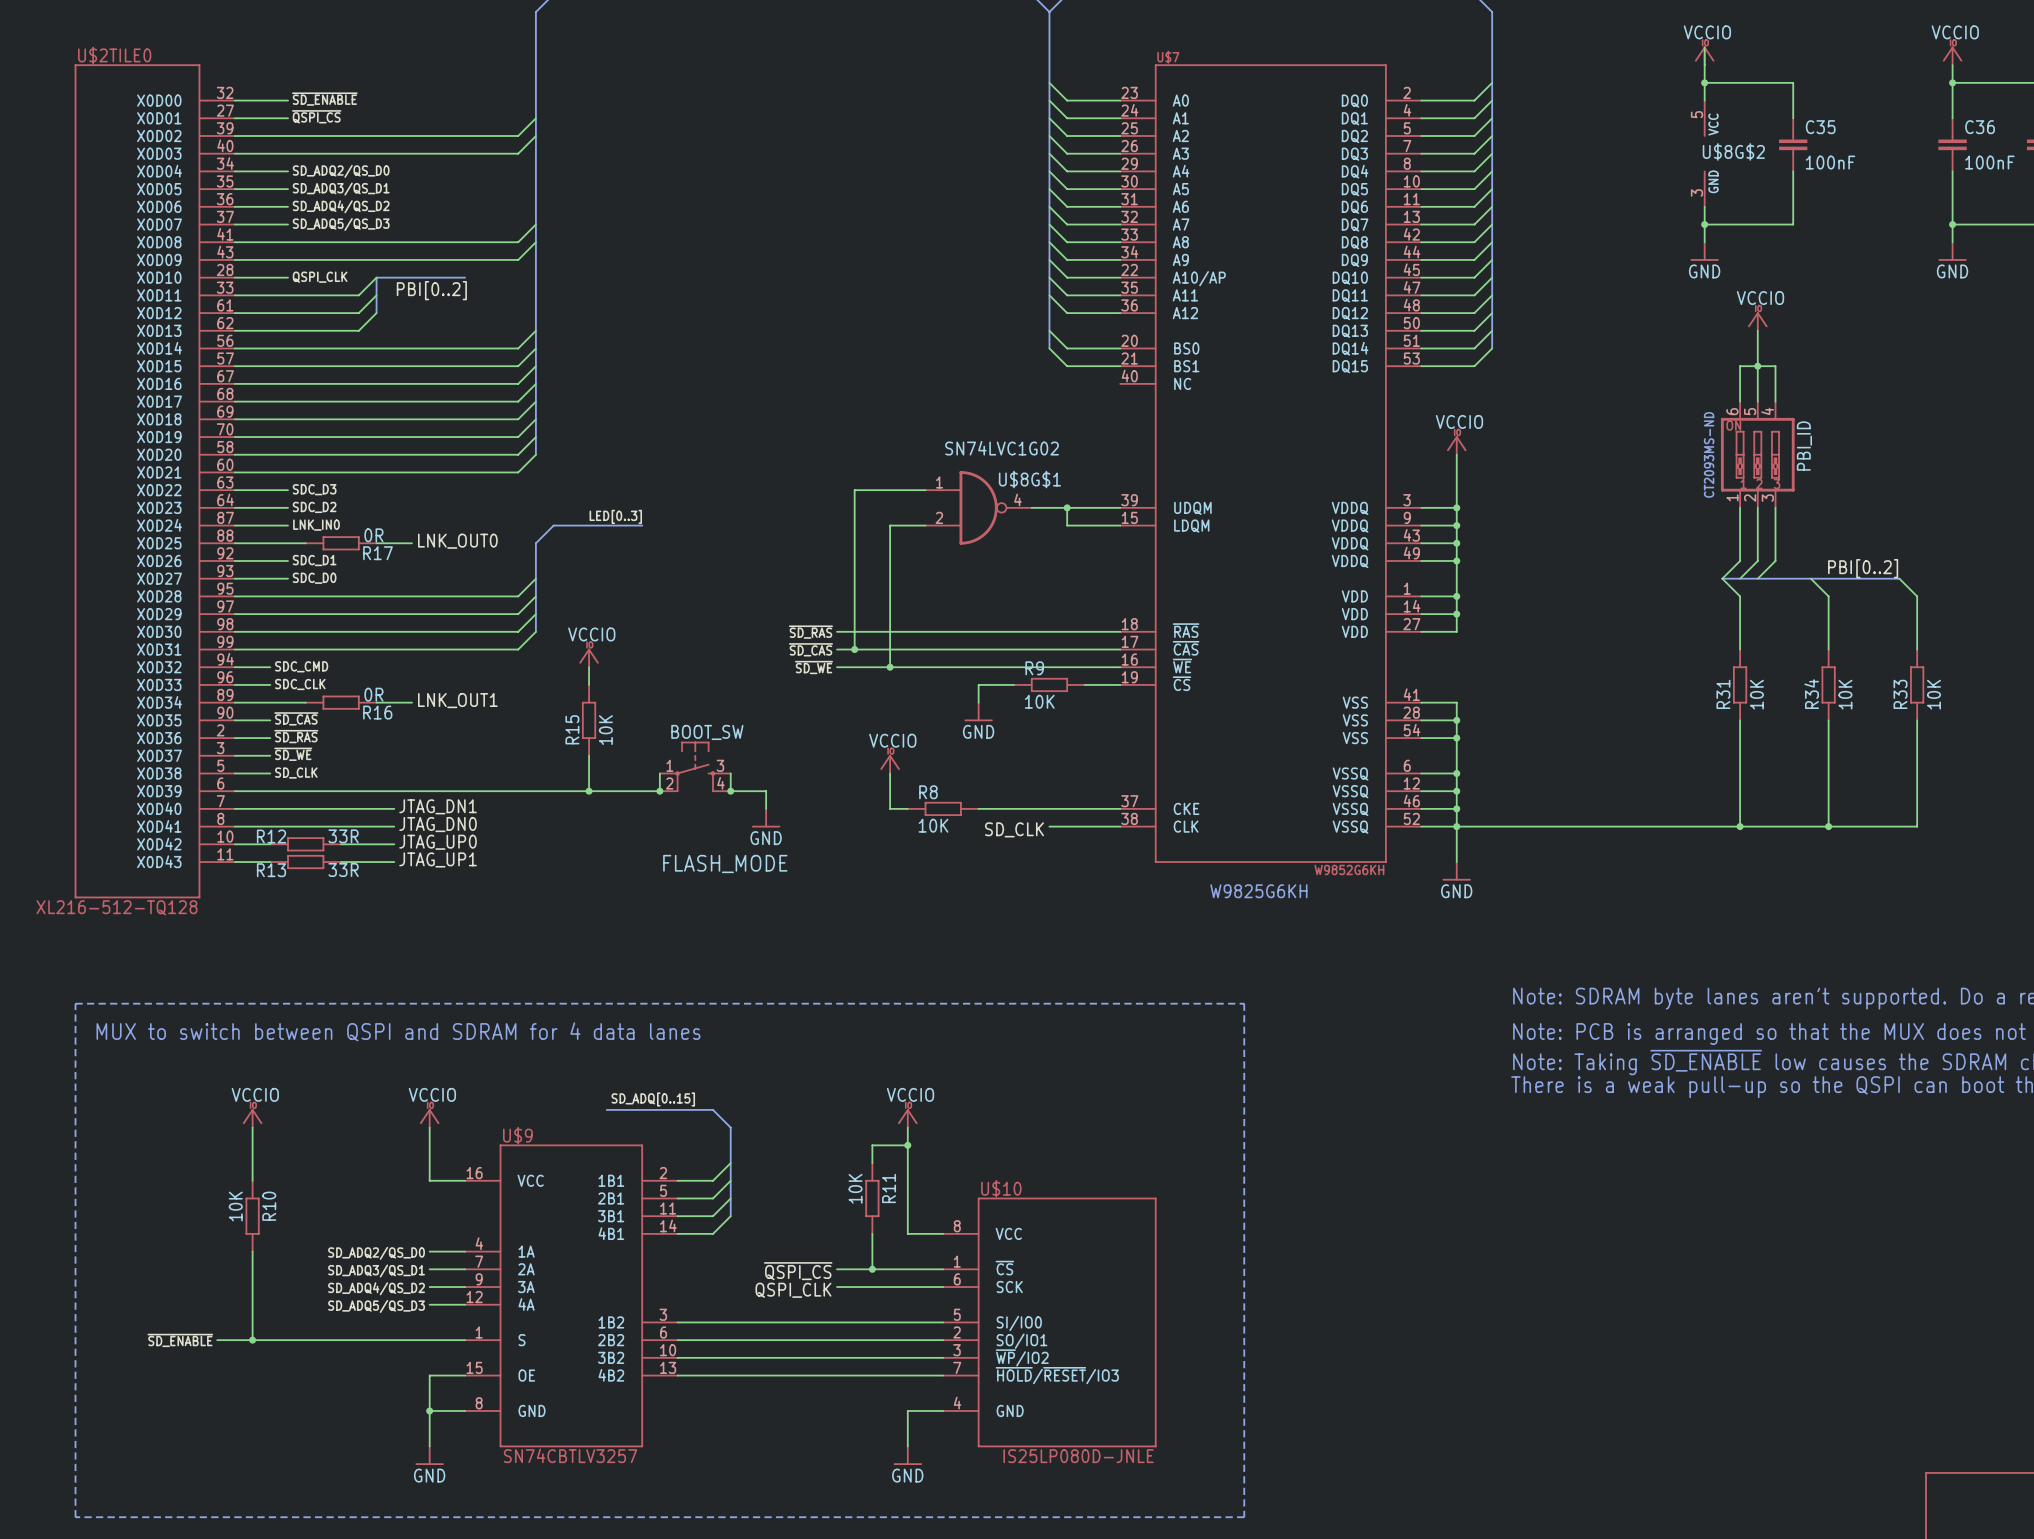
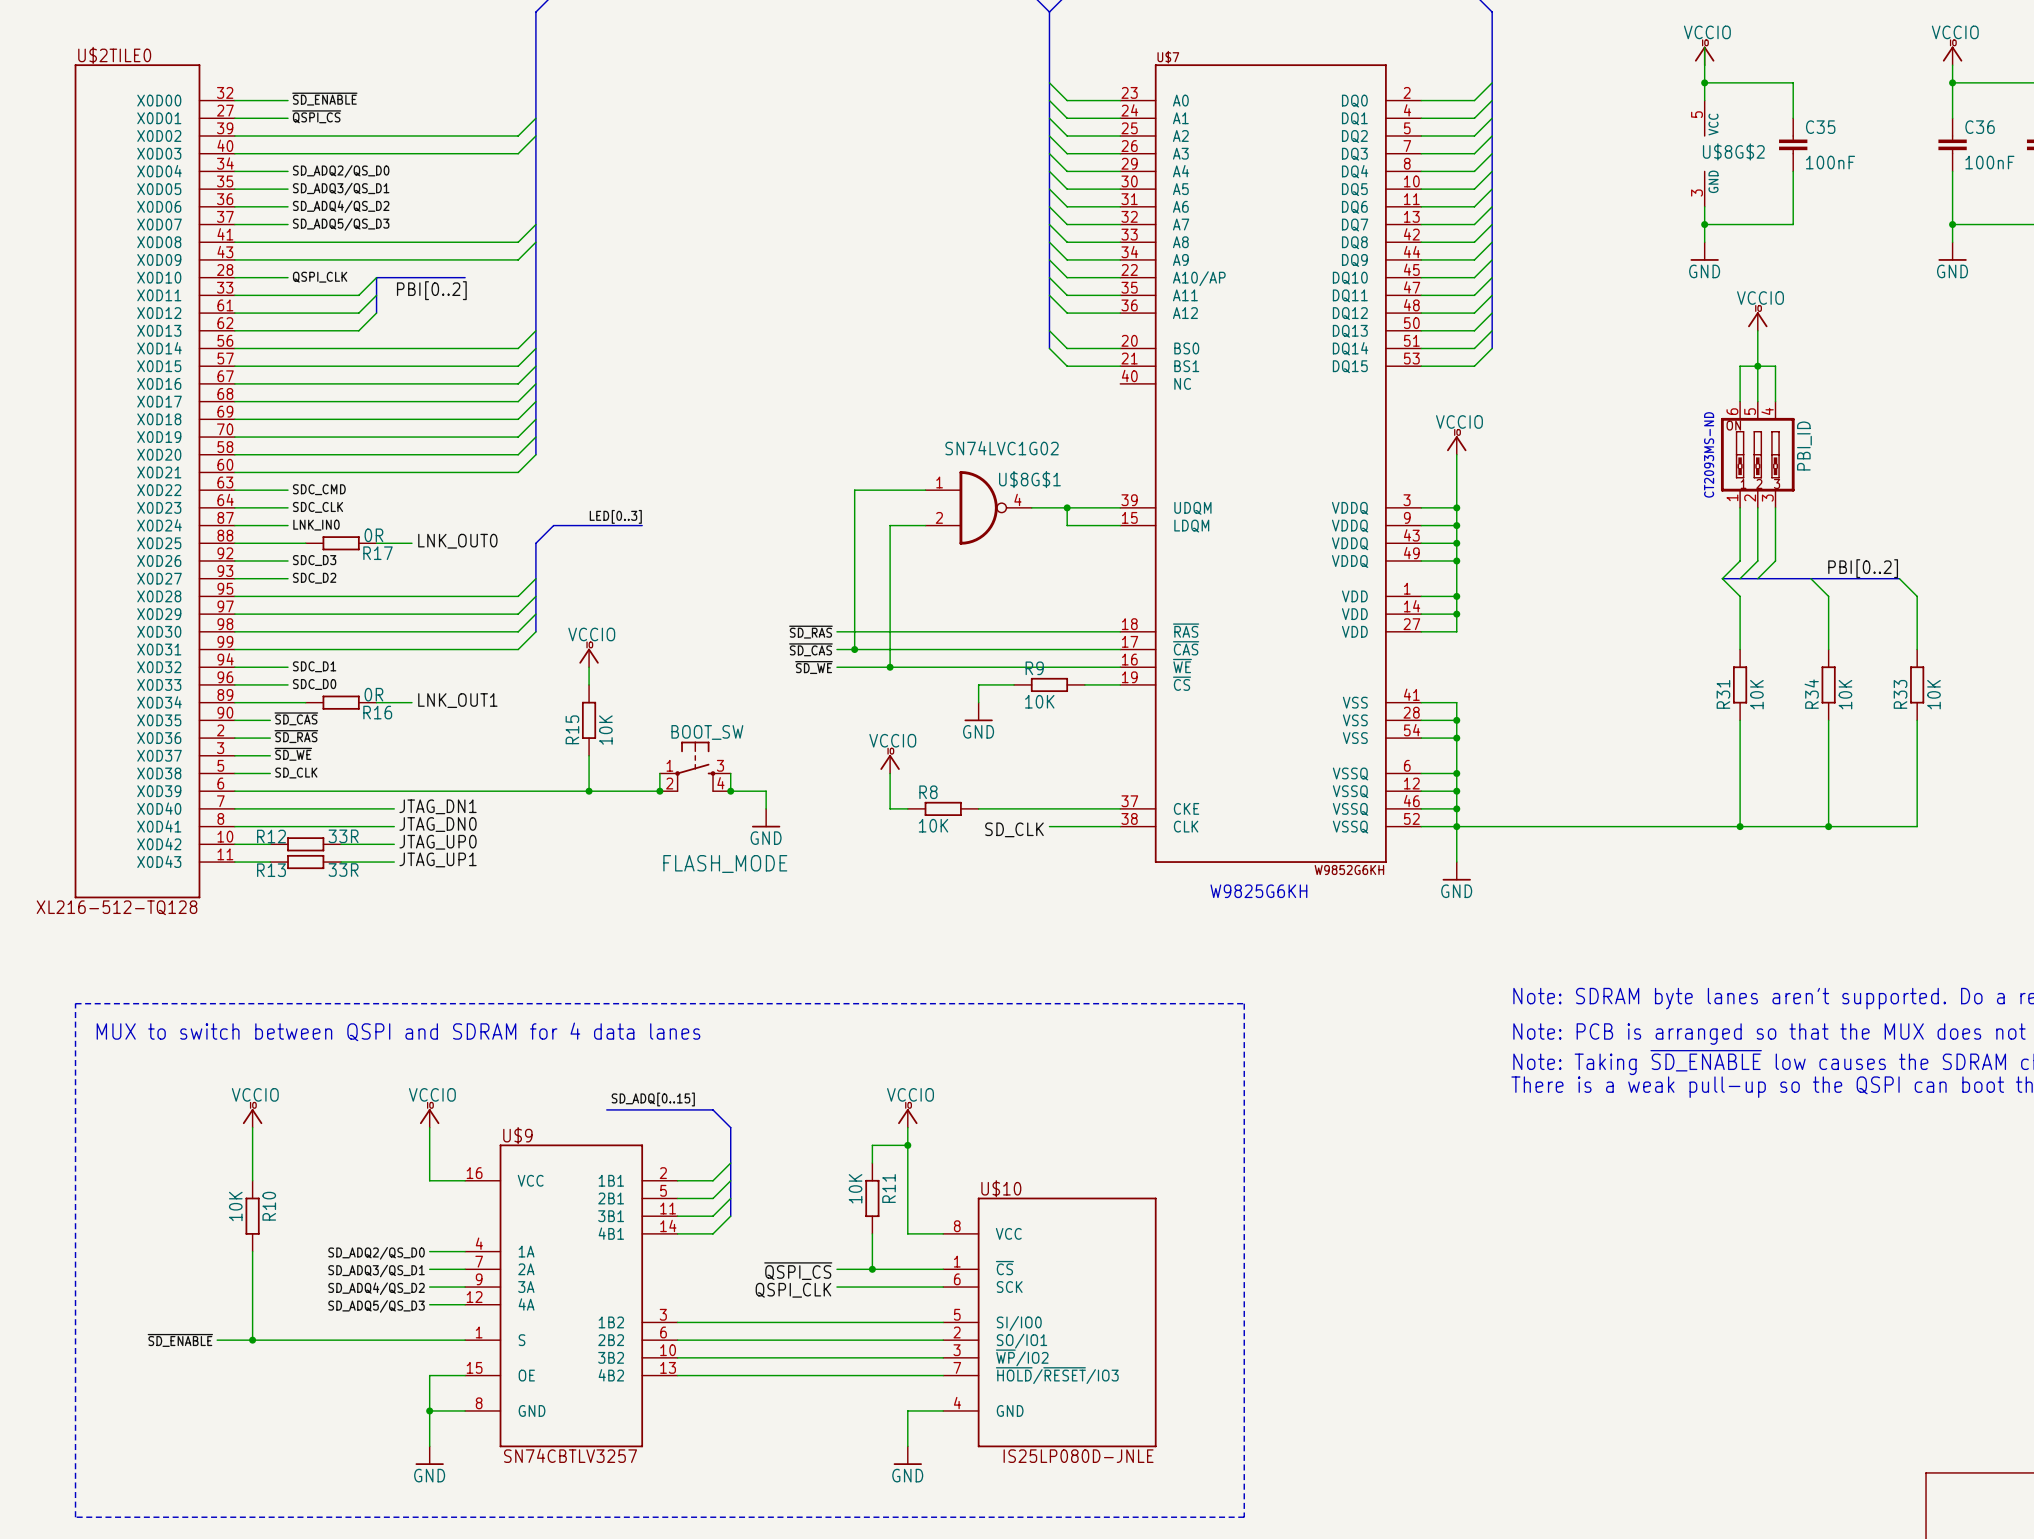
label: SDC_D3 (314, 489) -> SDC_CMD (319, 489)
label: SDC_D2 (314, 507) -> SDC_CLK (318, 507)
label: SDC_D1 (314, 560) -> SDC_D3 (314, 560)
label: SDC_D0 (314, 578) -> SDC_D2 (314, 578)
label: SDC_CMD (301, 666) -> none
label: none -> SDC_D1 (314, 666)
wire: none -> (270, 667) (288, 667)
wire: none -> (270, 684) (288, 684)
label: SDC_CLK (300, 684) -> none
label: none -> SDC_D0 (314, 684)

